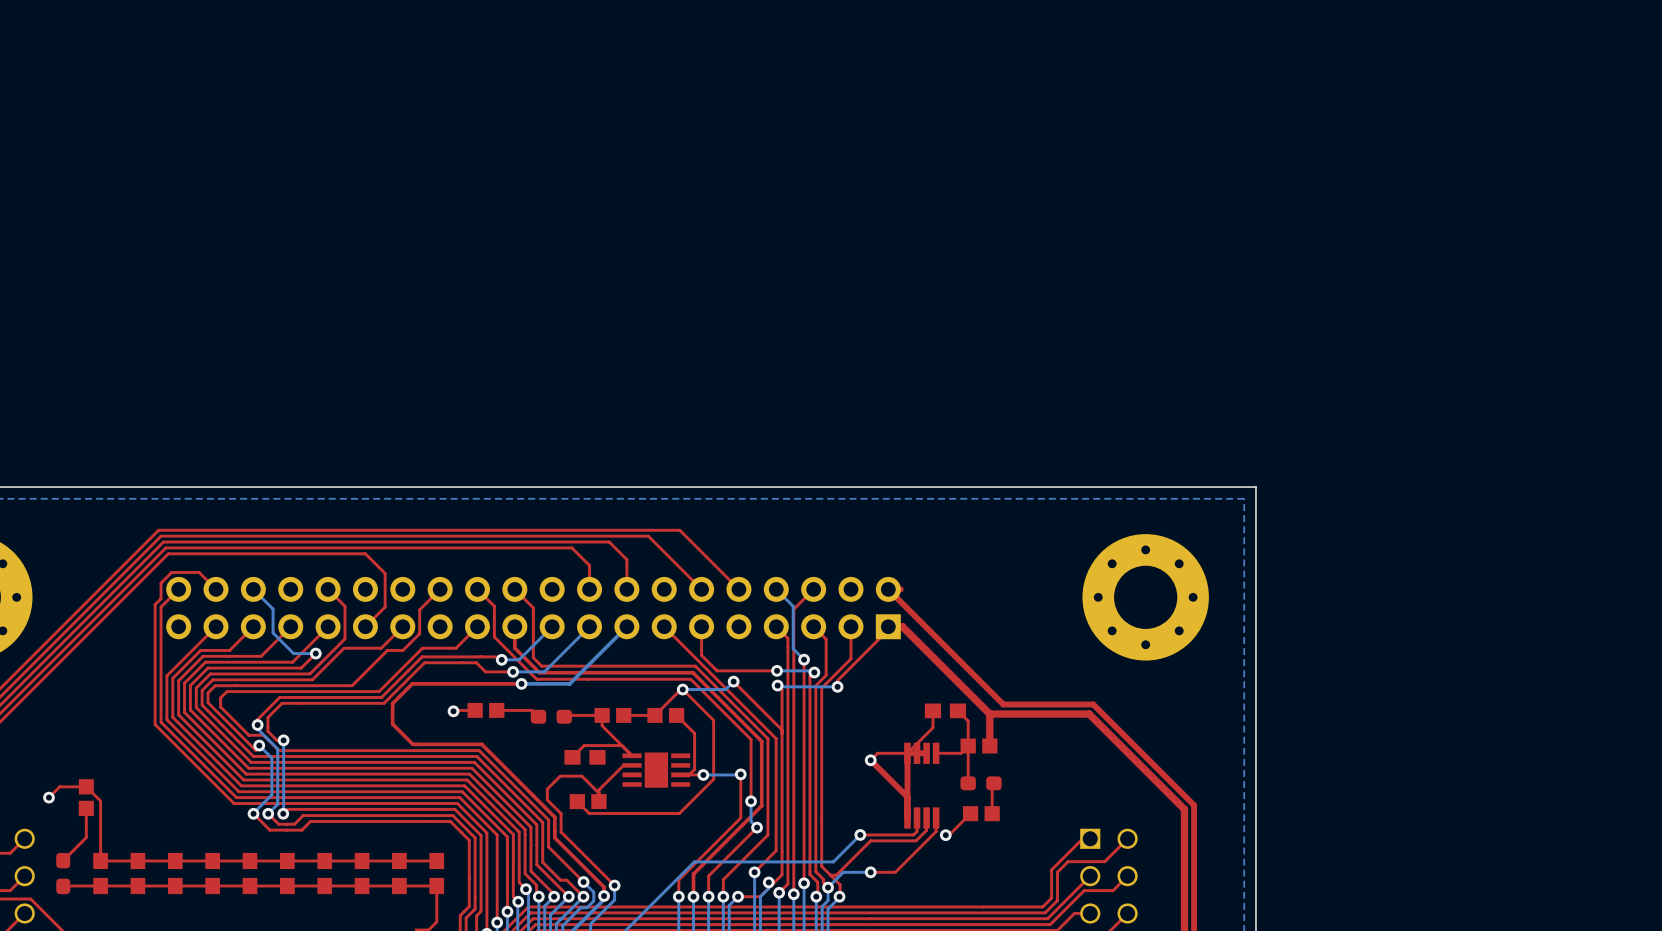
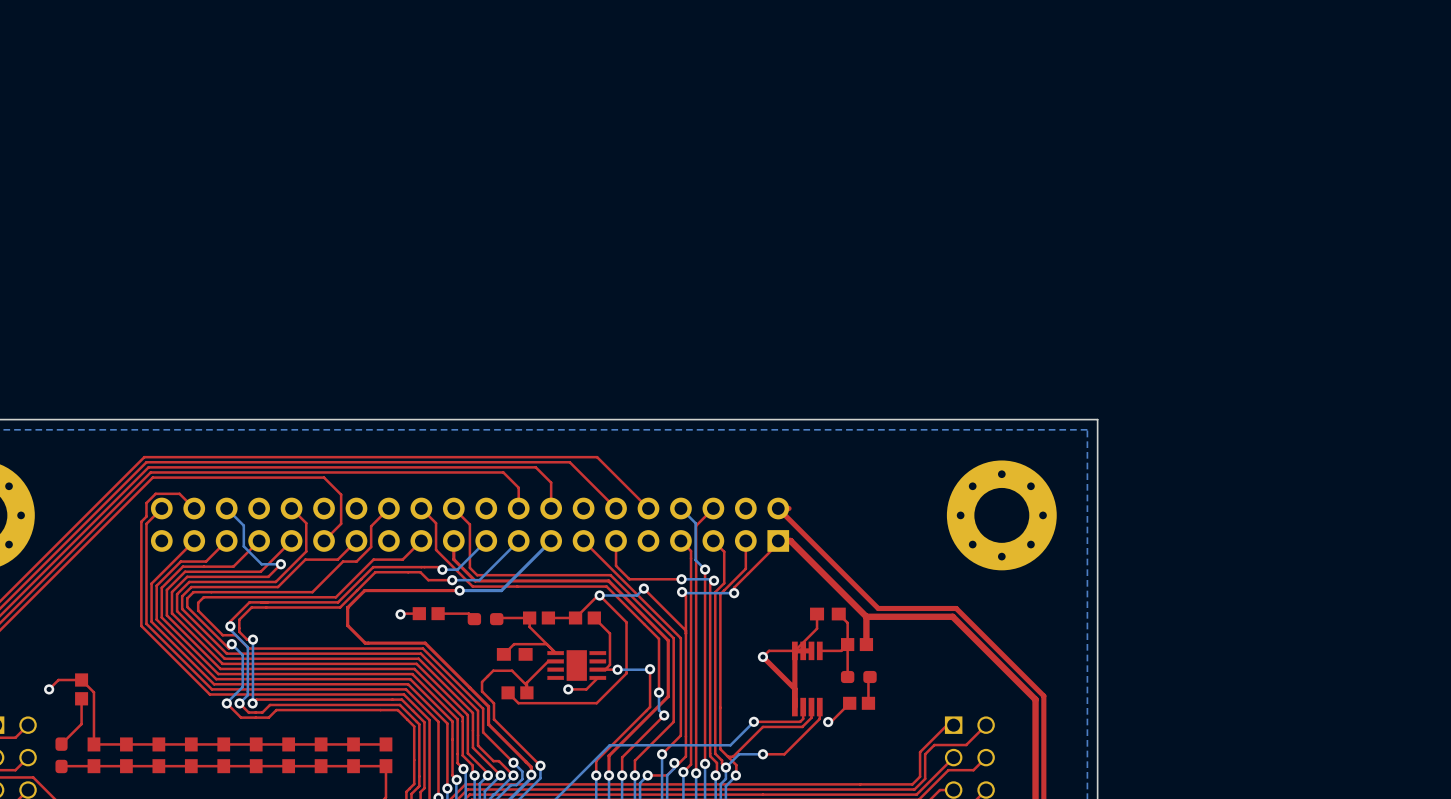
top track: none -> (597, 677) (586, 689) (568, 689)
via: none -> (568, 689)

